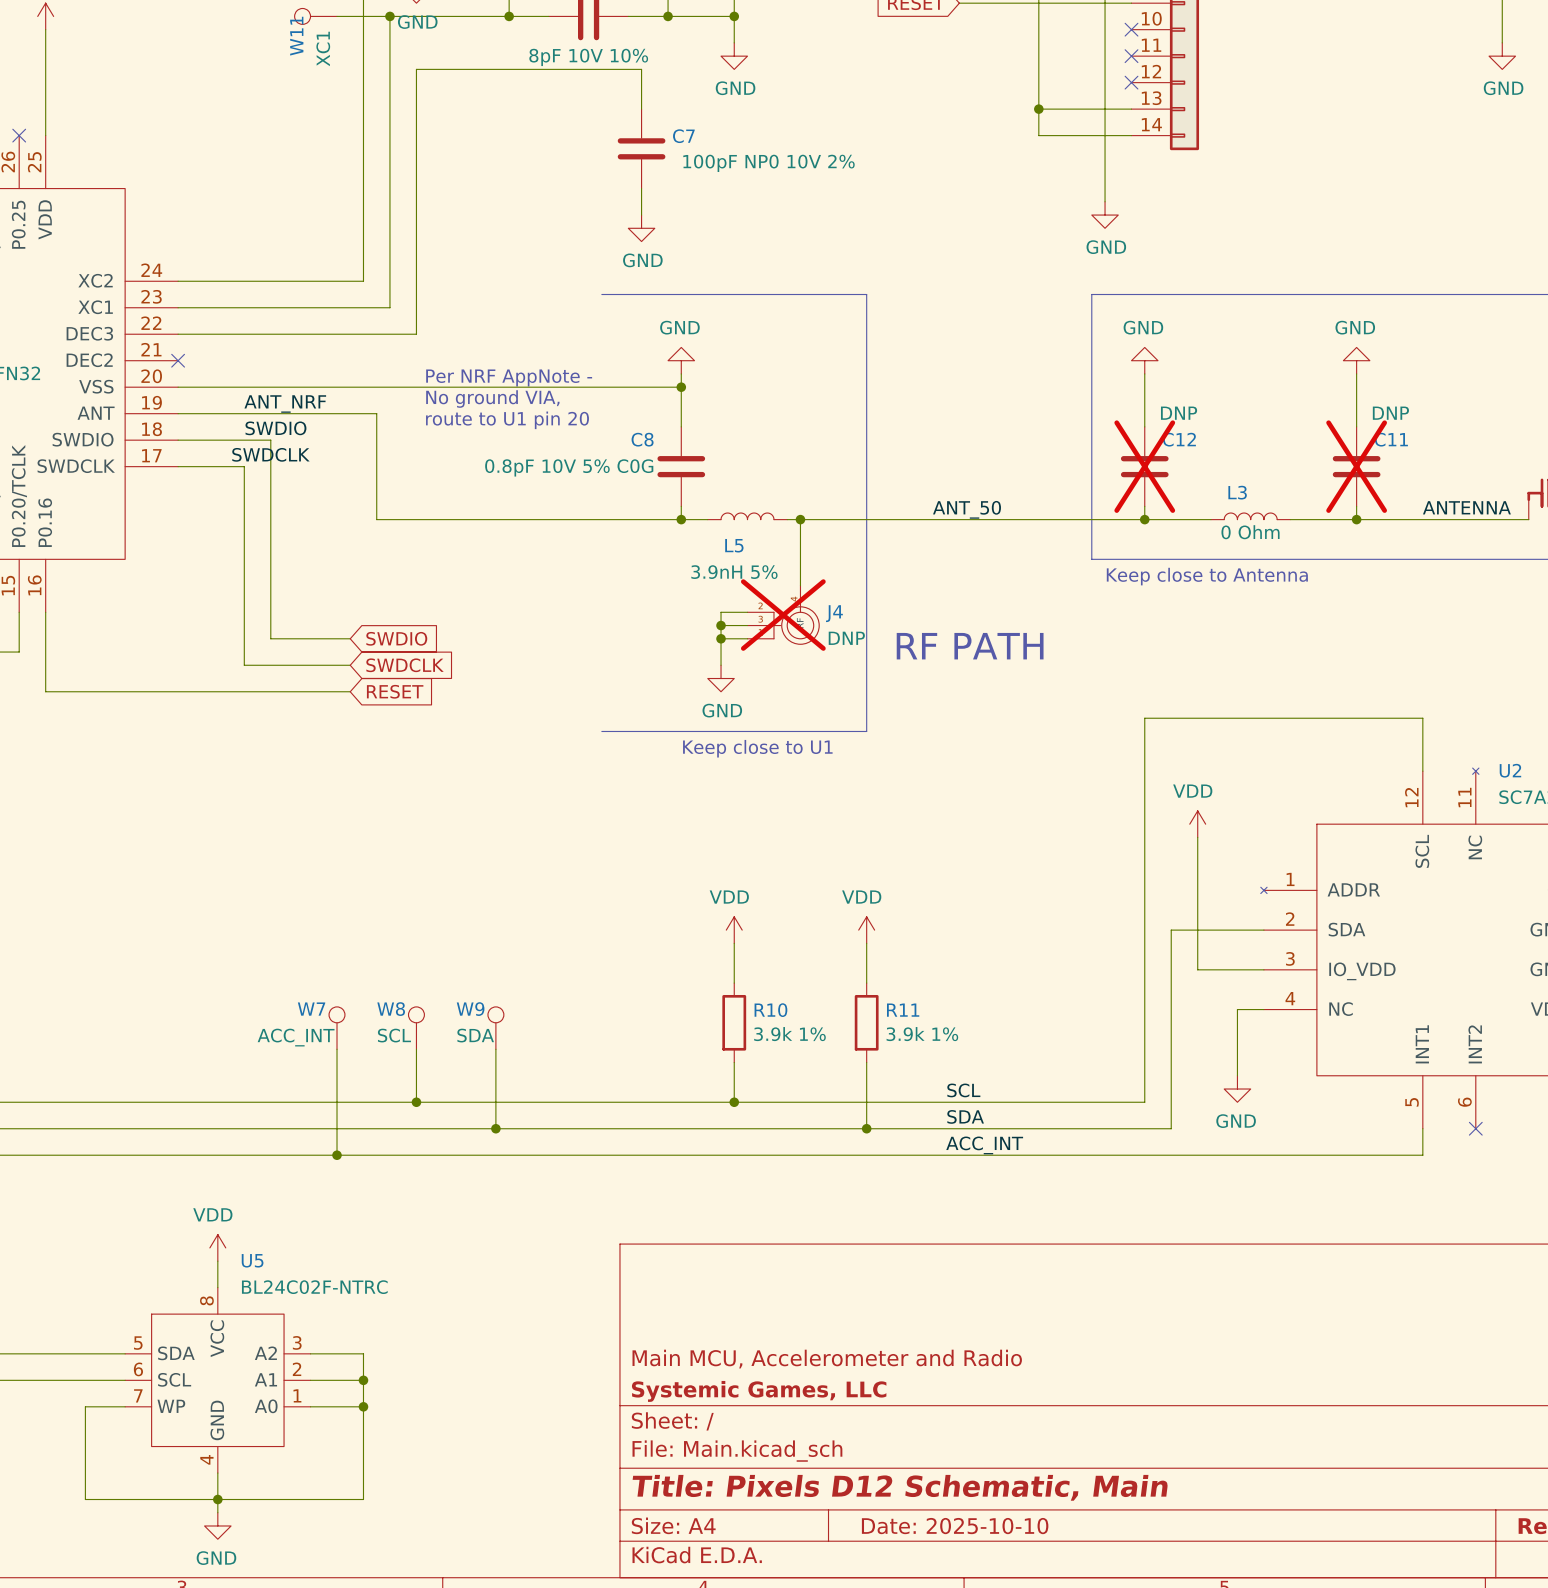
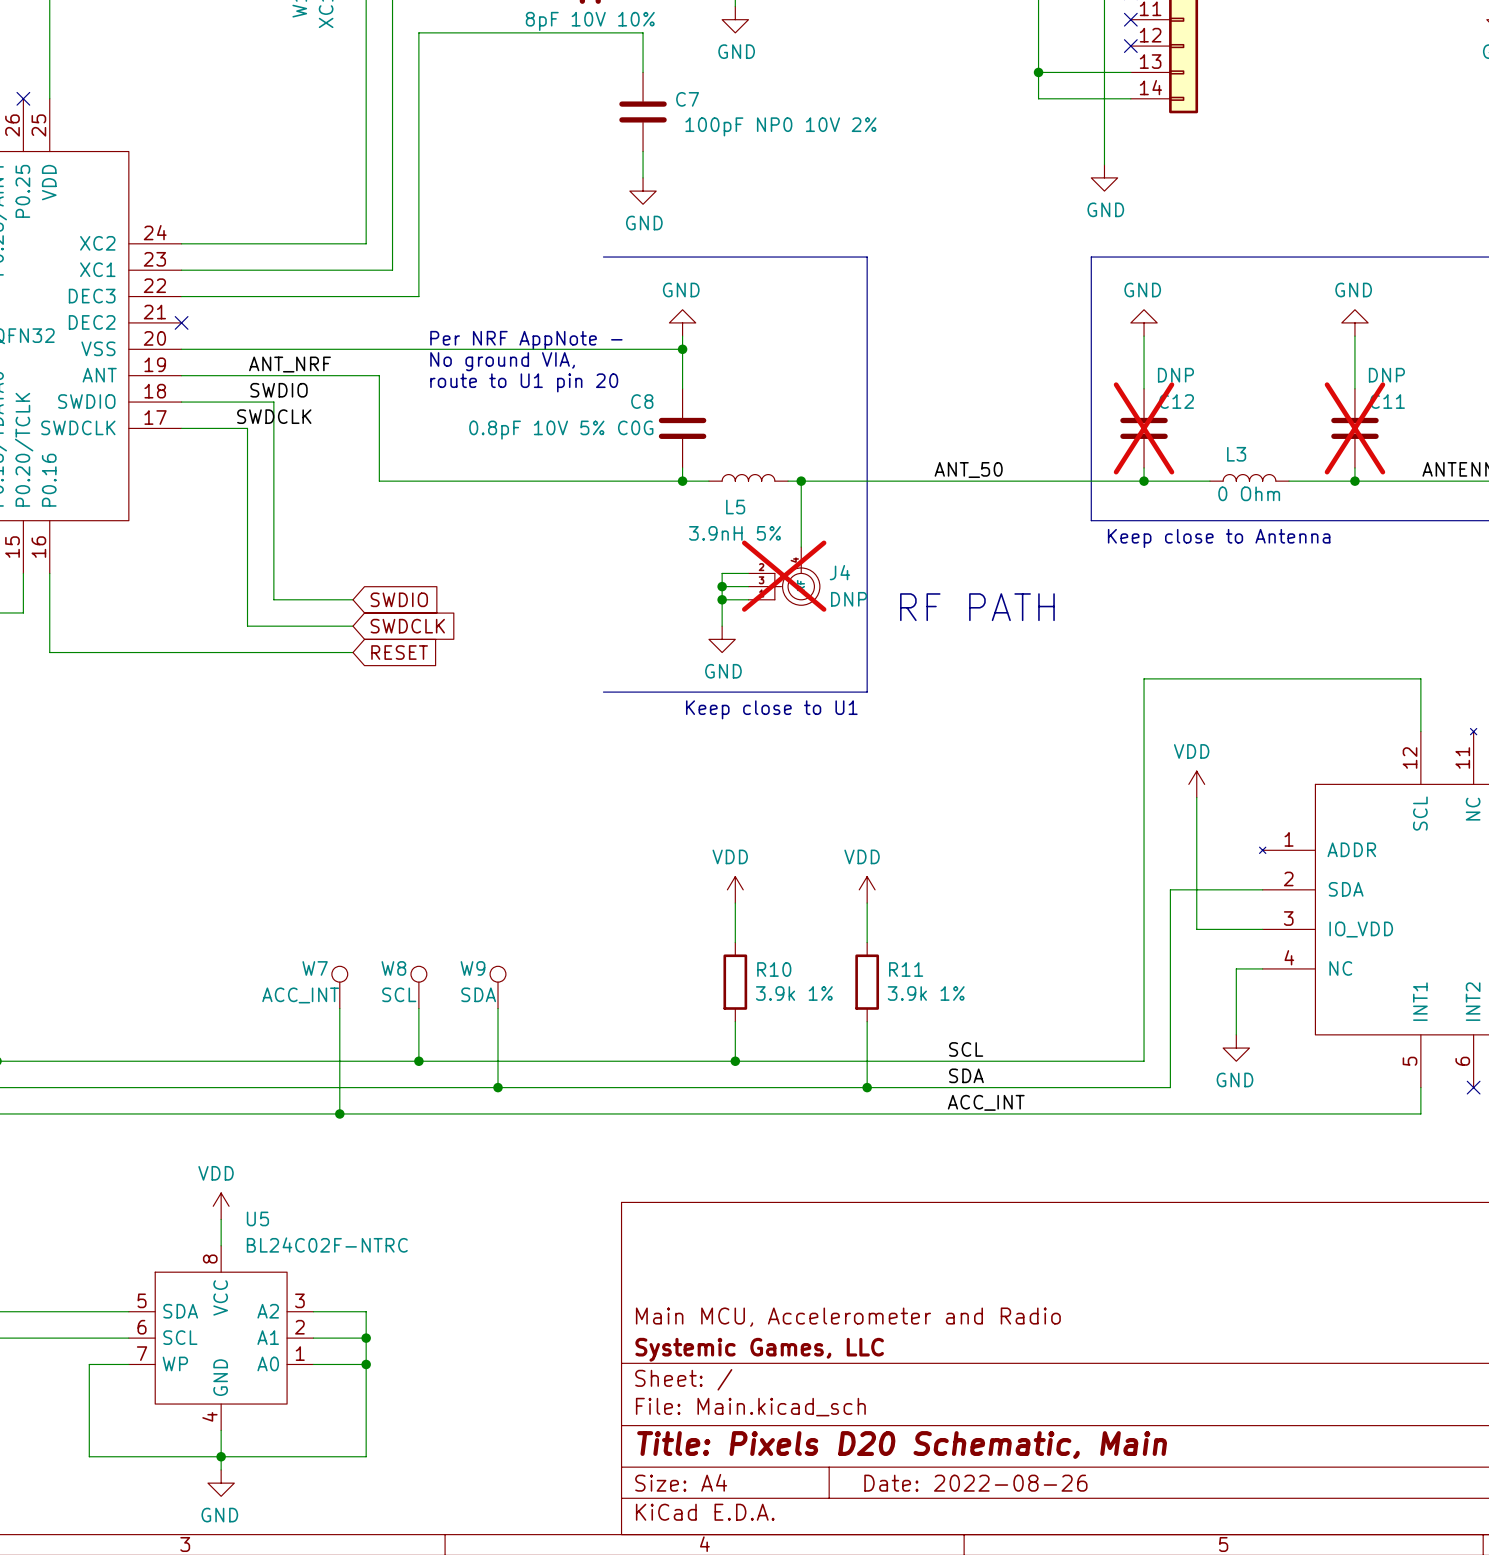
title block: Title: Pixels D12 Schematic, Main (900, 1487) -> Title: Pixels D20 Schematic, Main (902, 1445)
title block: Date: 2025-10-10 (955, 1526) -> Date: 2022-08-26 (975, 1483)

